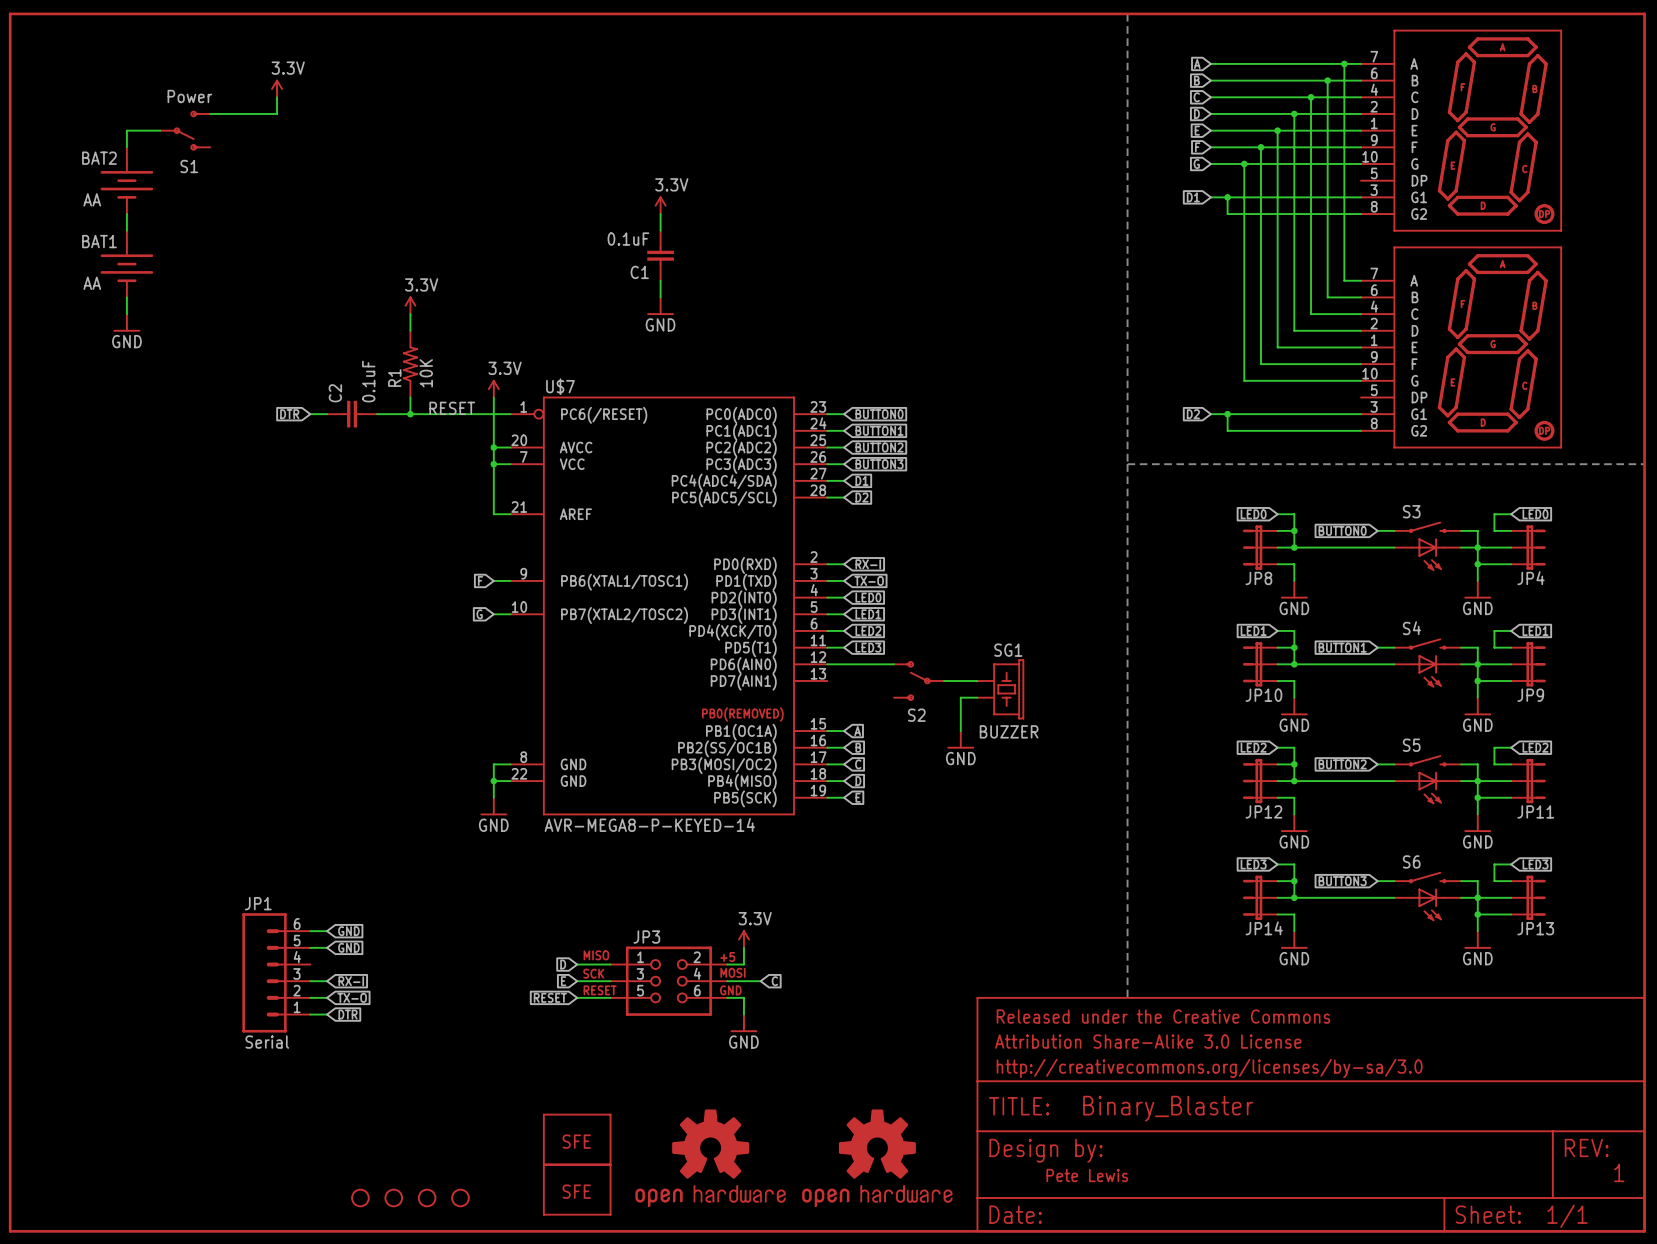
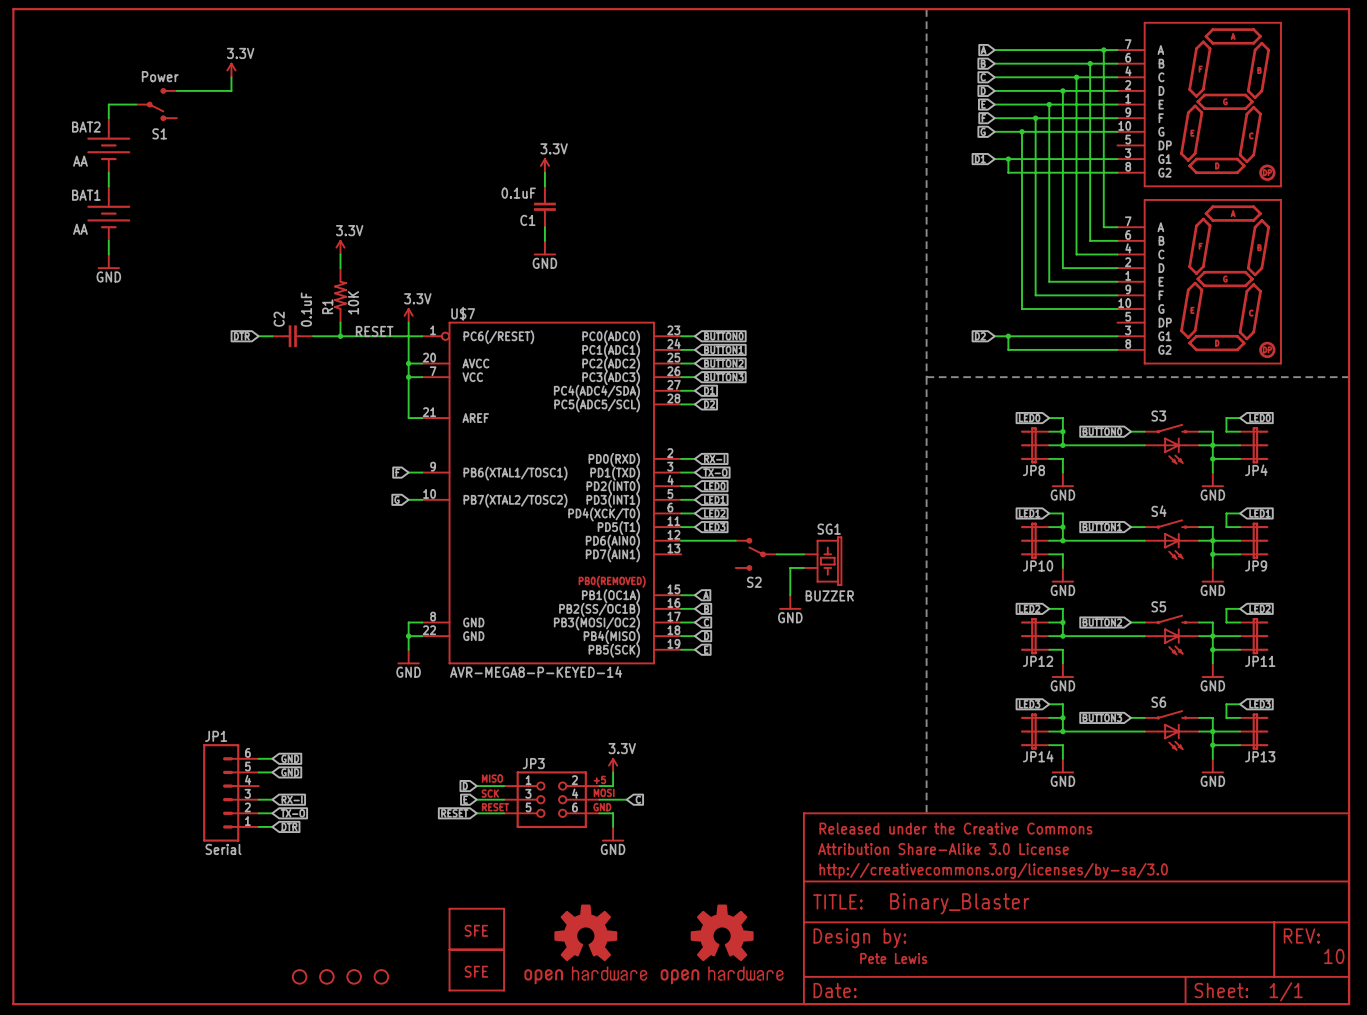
text: 1 (1619, 1172) -> 10 (1334, 956)

